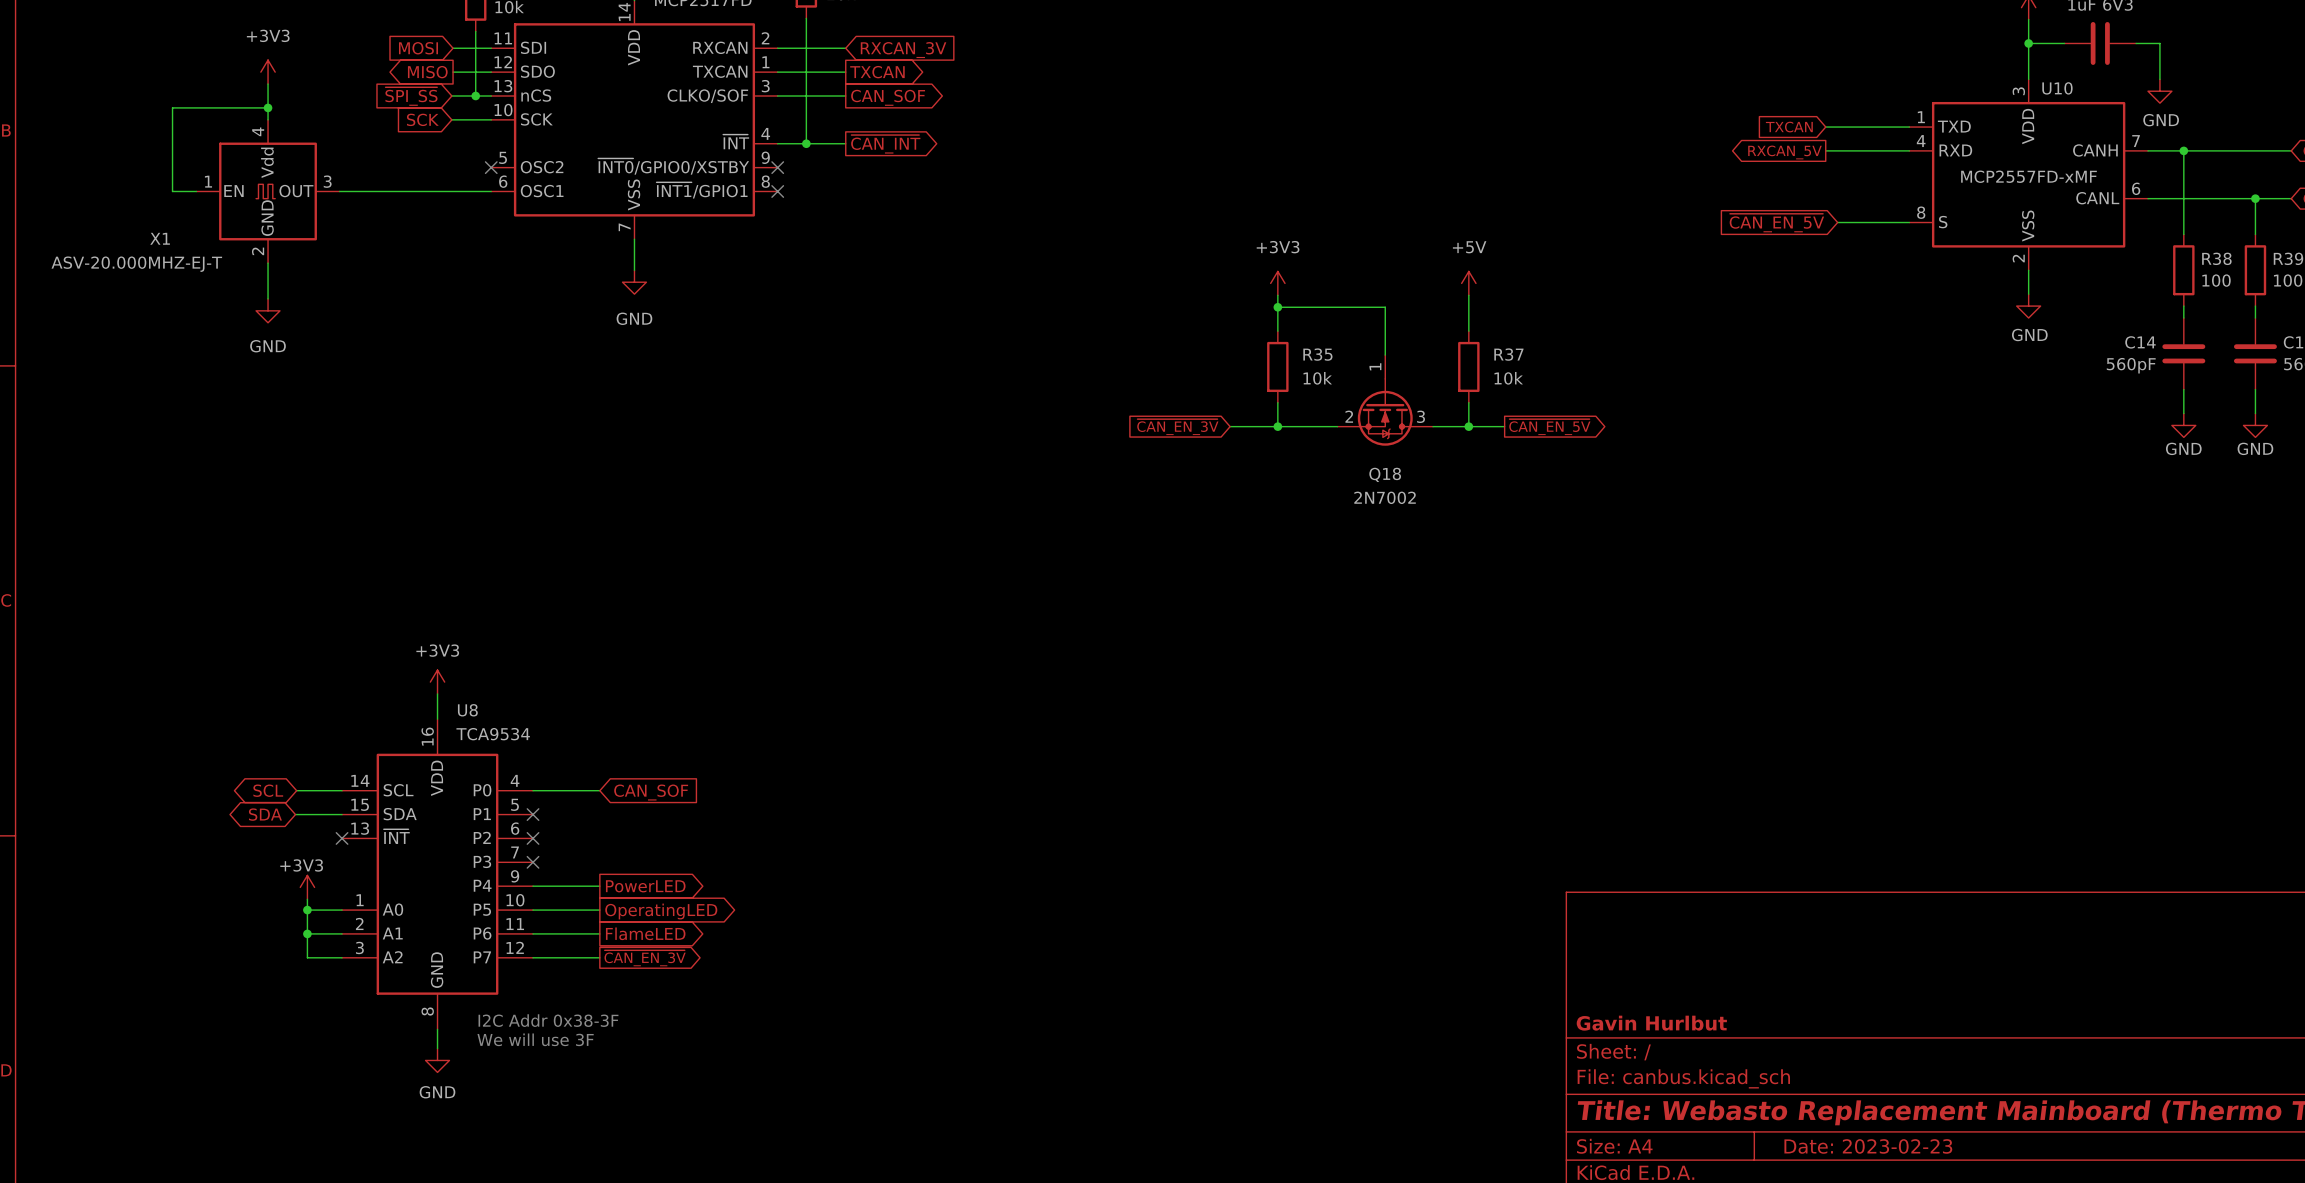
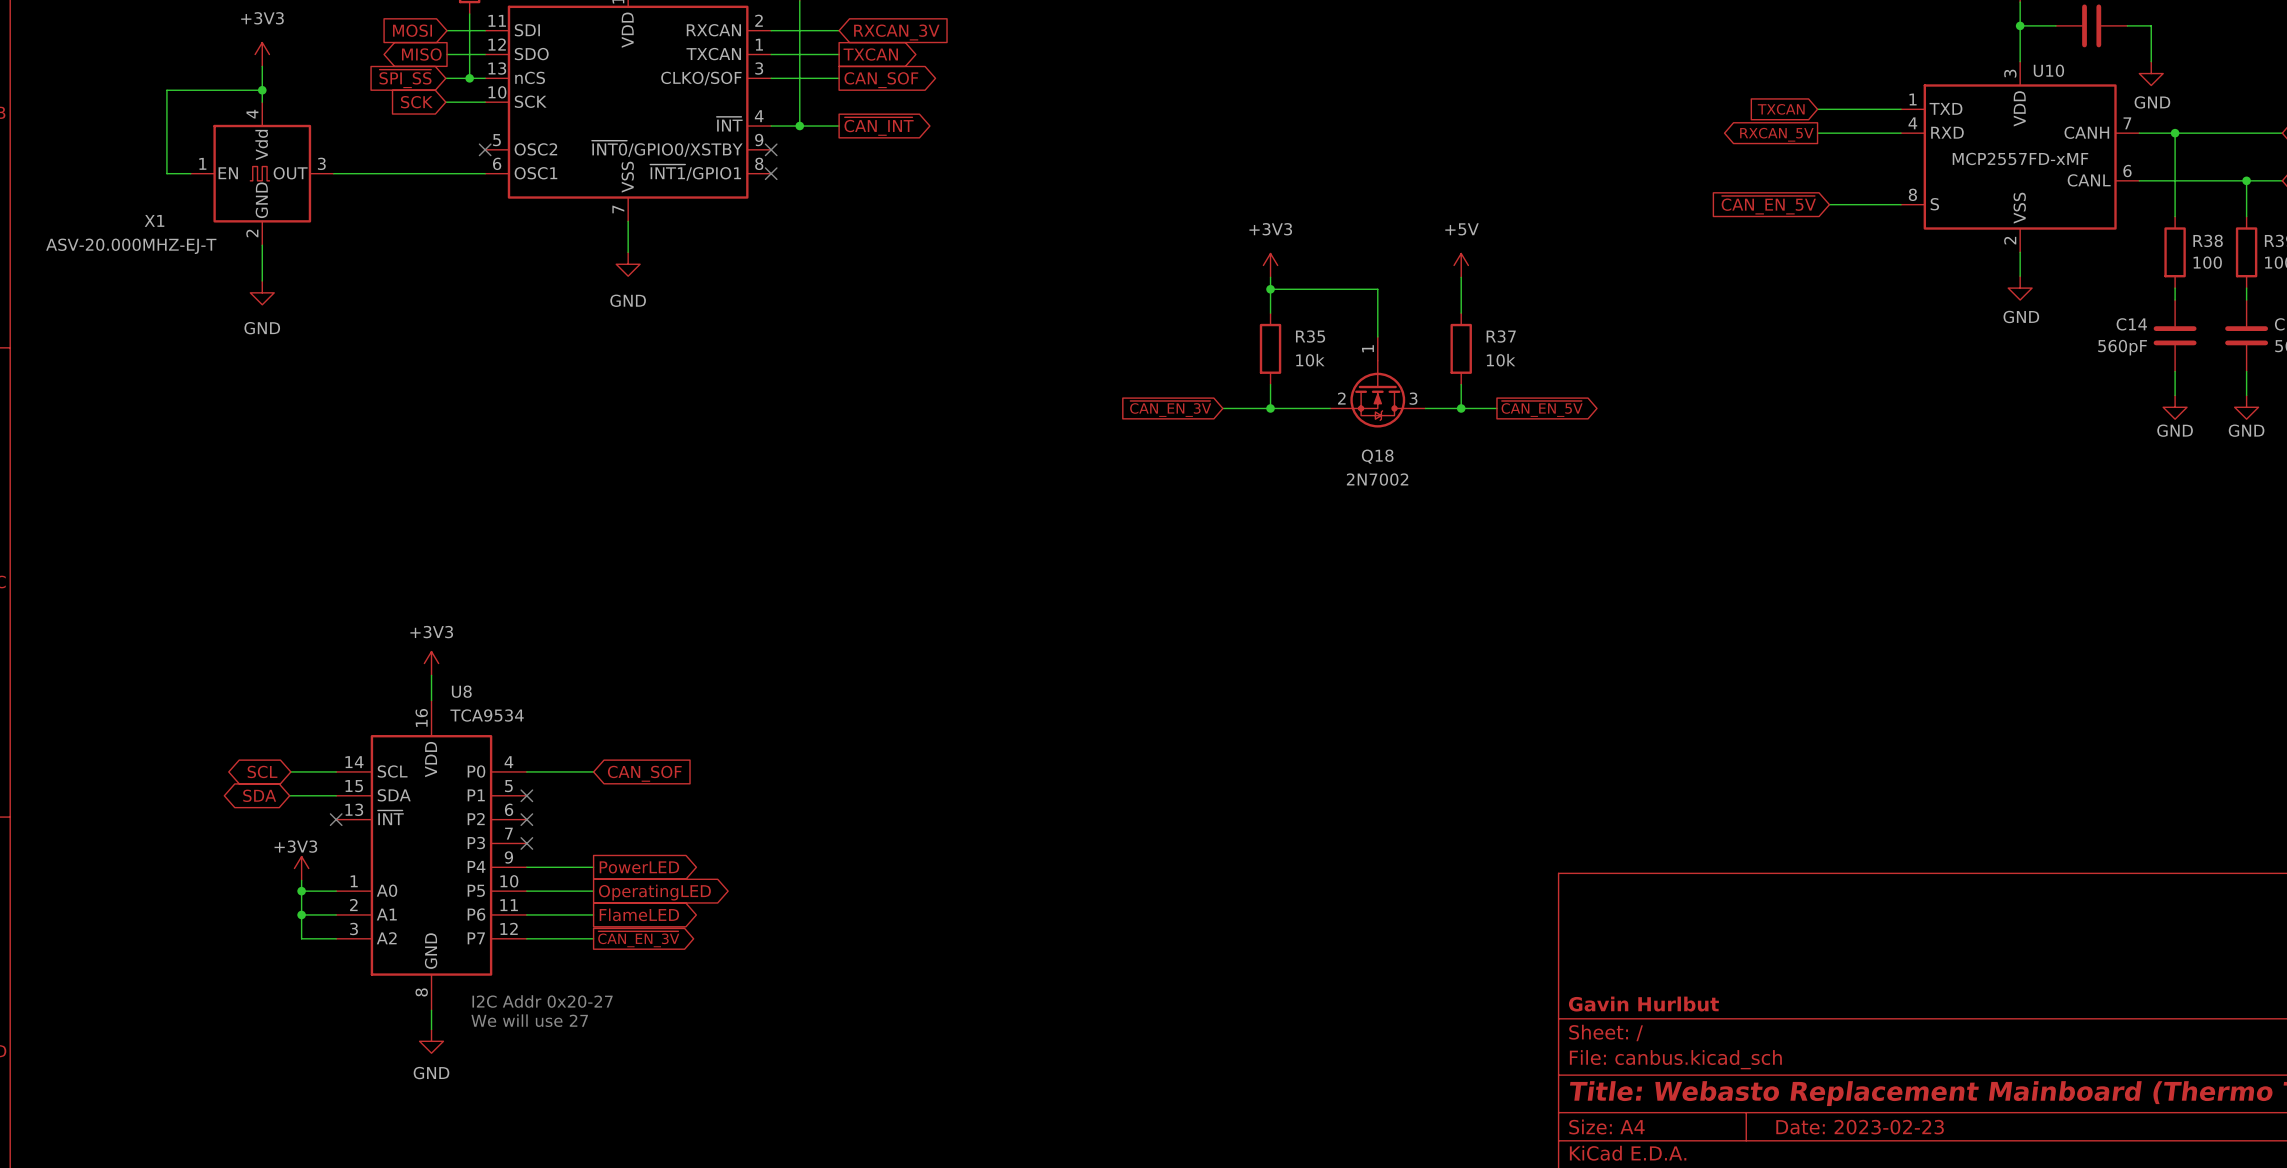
text: I2C Addr 0x38-3F (548, 1020) -> I2C Addr 0x20-27 (542, 1001)
text: We will use 3F (535, 1039) -> We will use 27 (529, 1020)

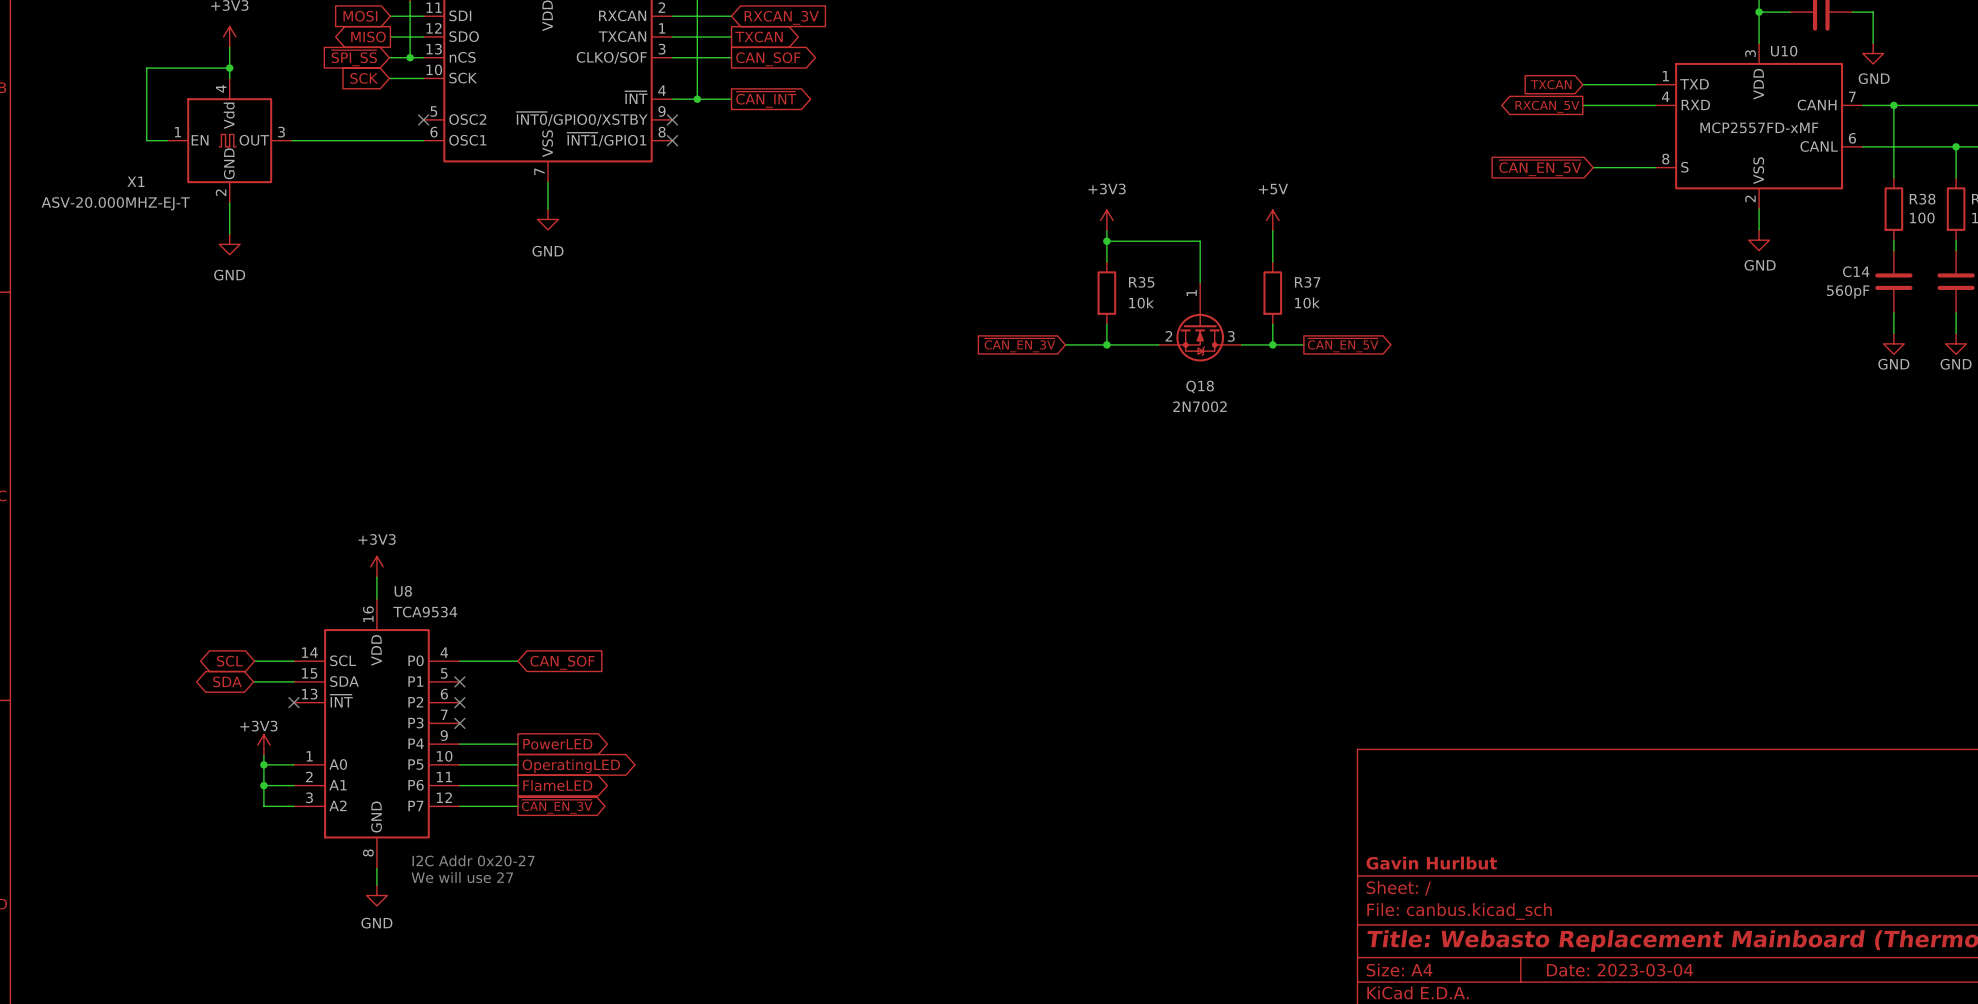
title block: Date: 2023-02-23 (1860, 1127) -> Date: 2023-03-04 (1620, 970)

